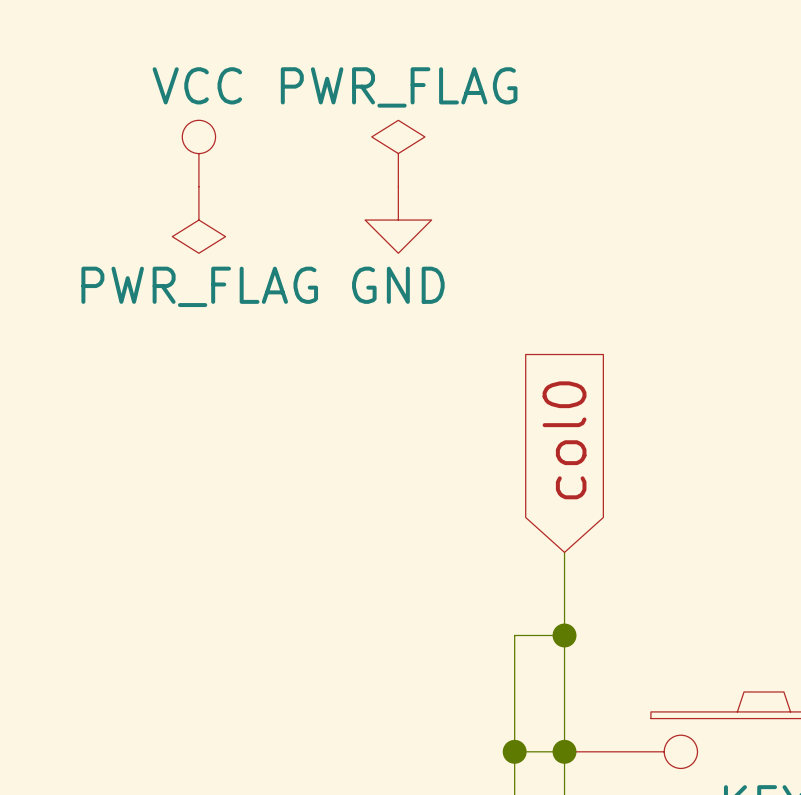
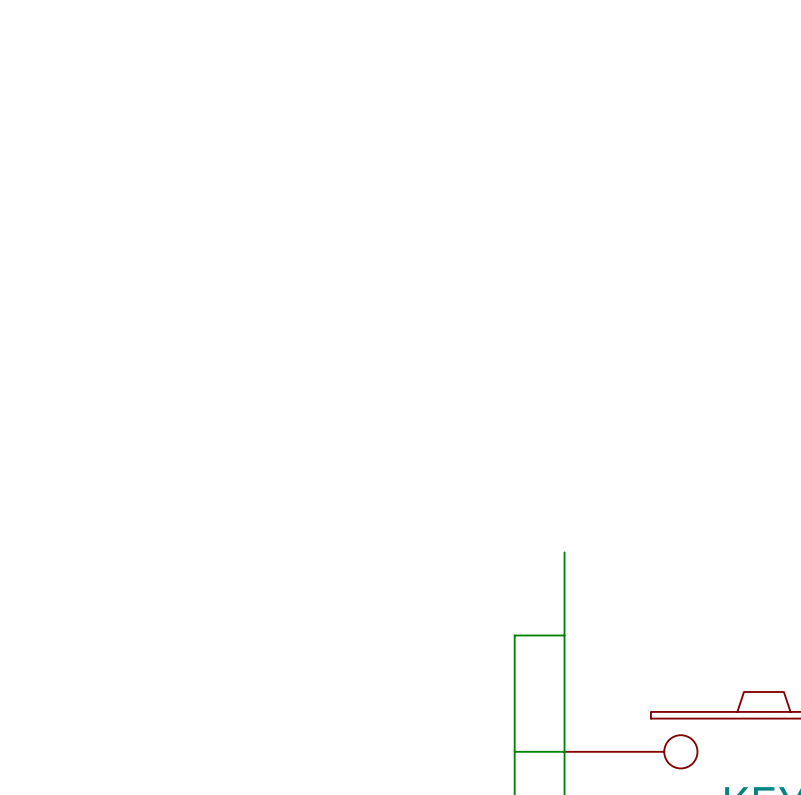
power symbol: VCC (198, 153) -> none
power symbol: PWR_FLAG (398, 153) -> none
power symbol: PWR_FLAG (198, 220) -> none
power symbol: GND (398, 220) -> none
global label: col0 (564, 440) -> none
junction: (564, 635) -> none
junction: (514, 751) -> none
junction: (564, 751) -> none

